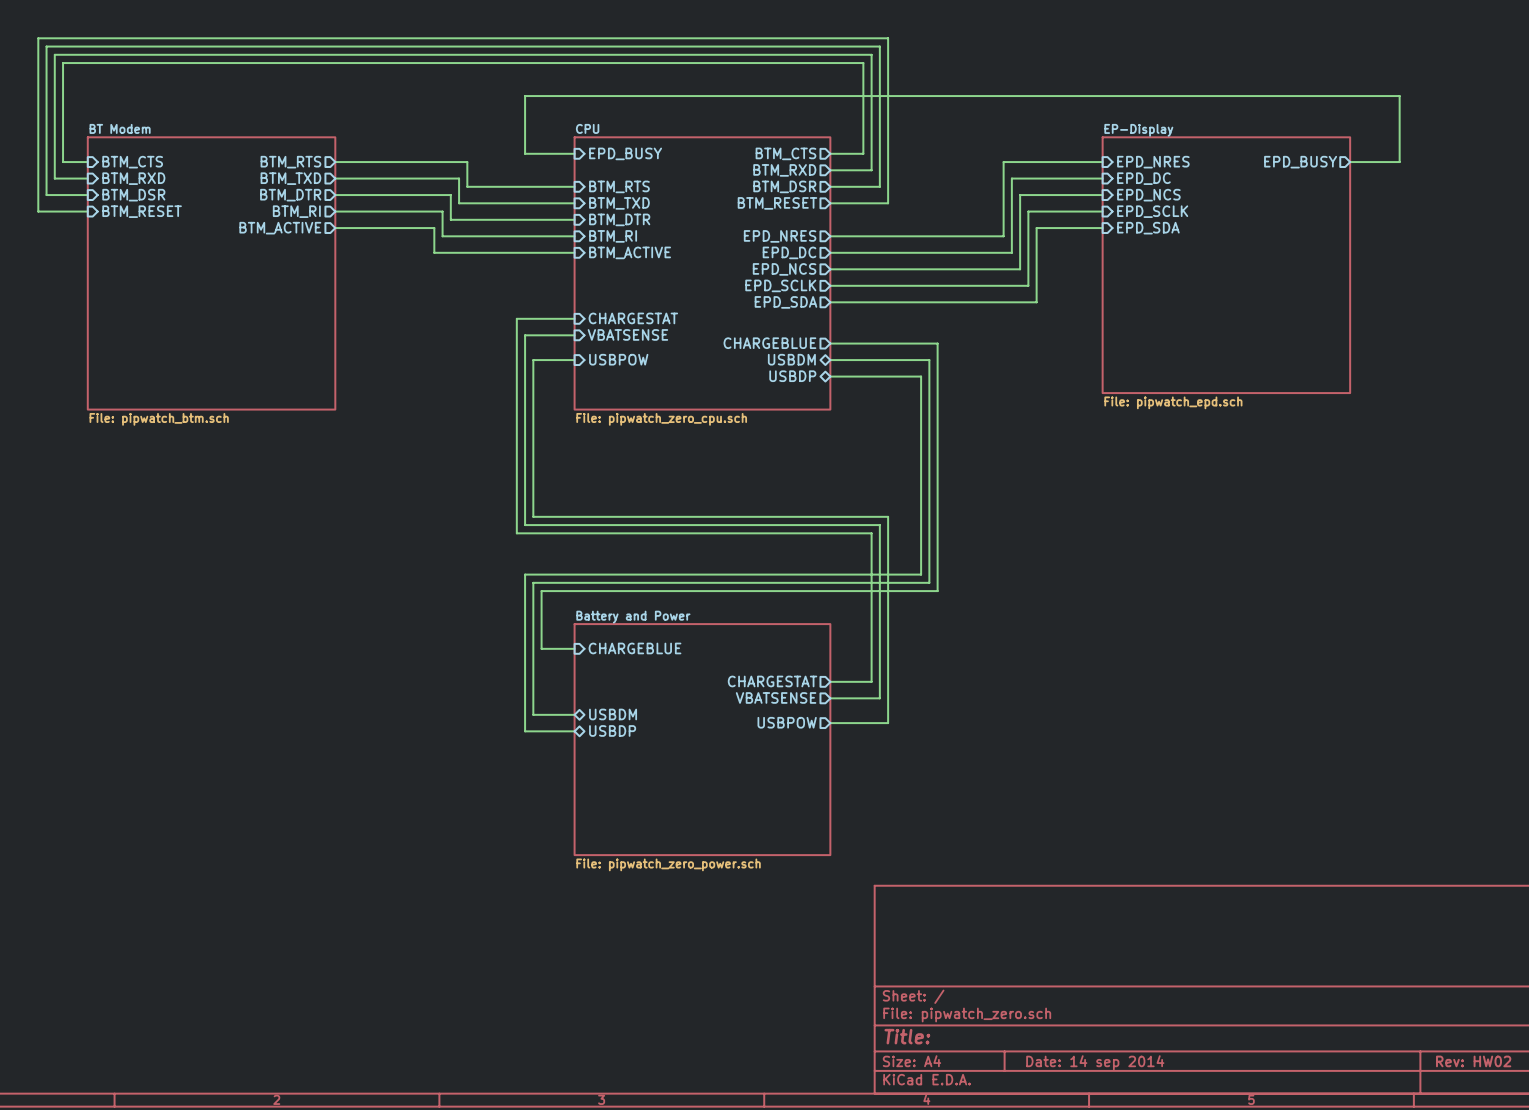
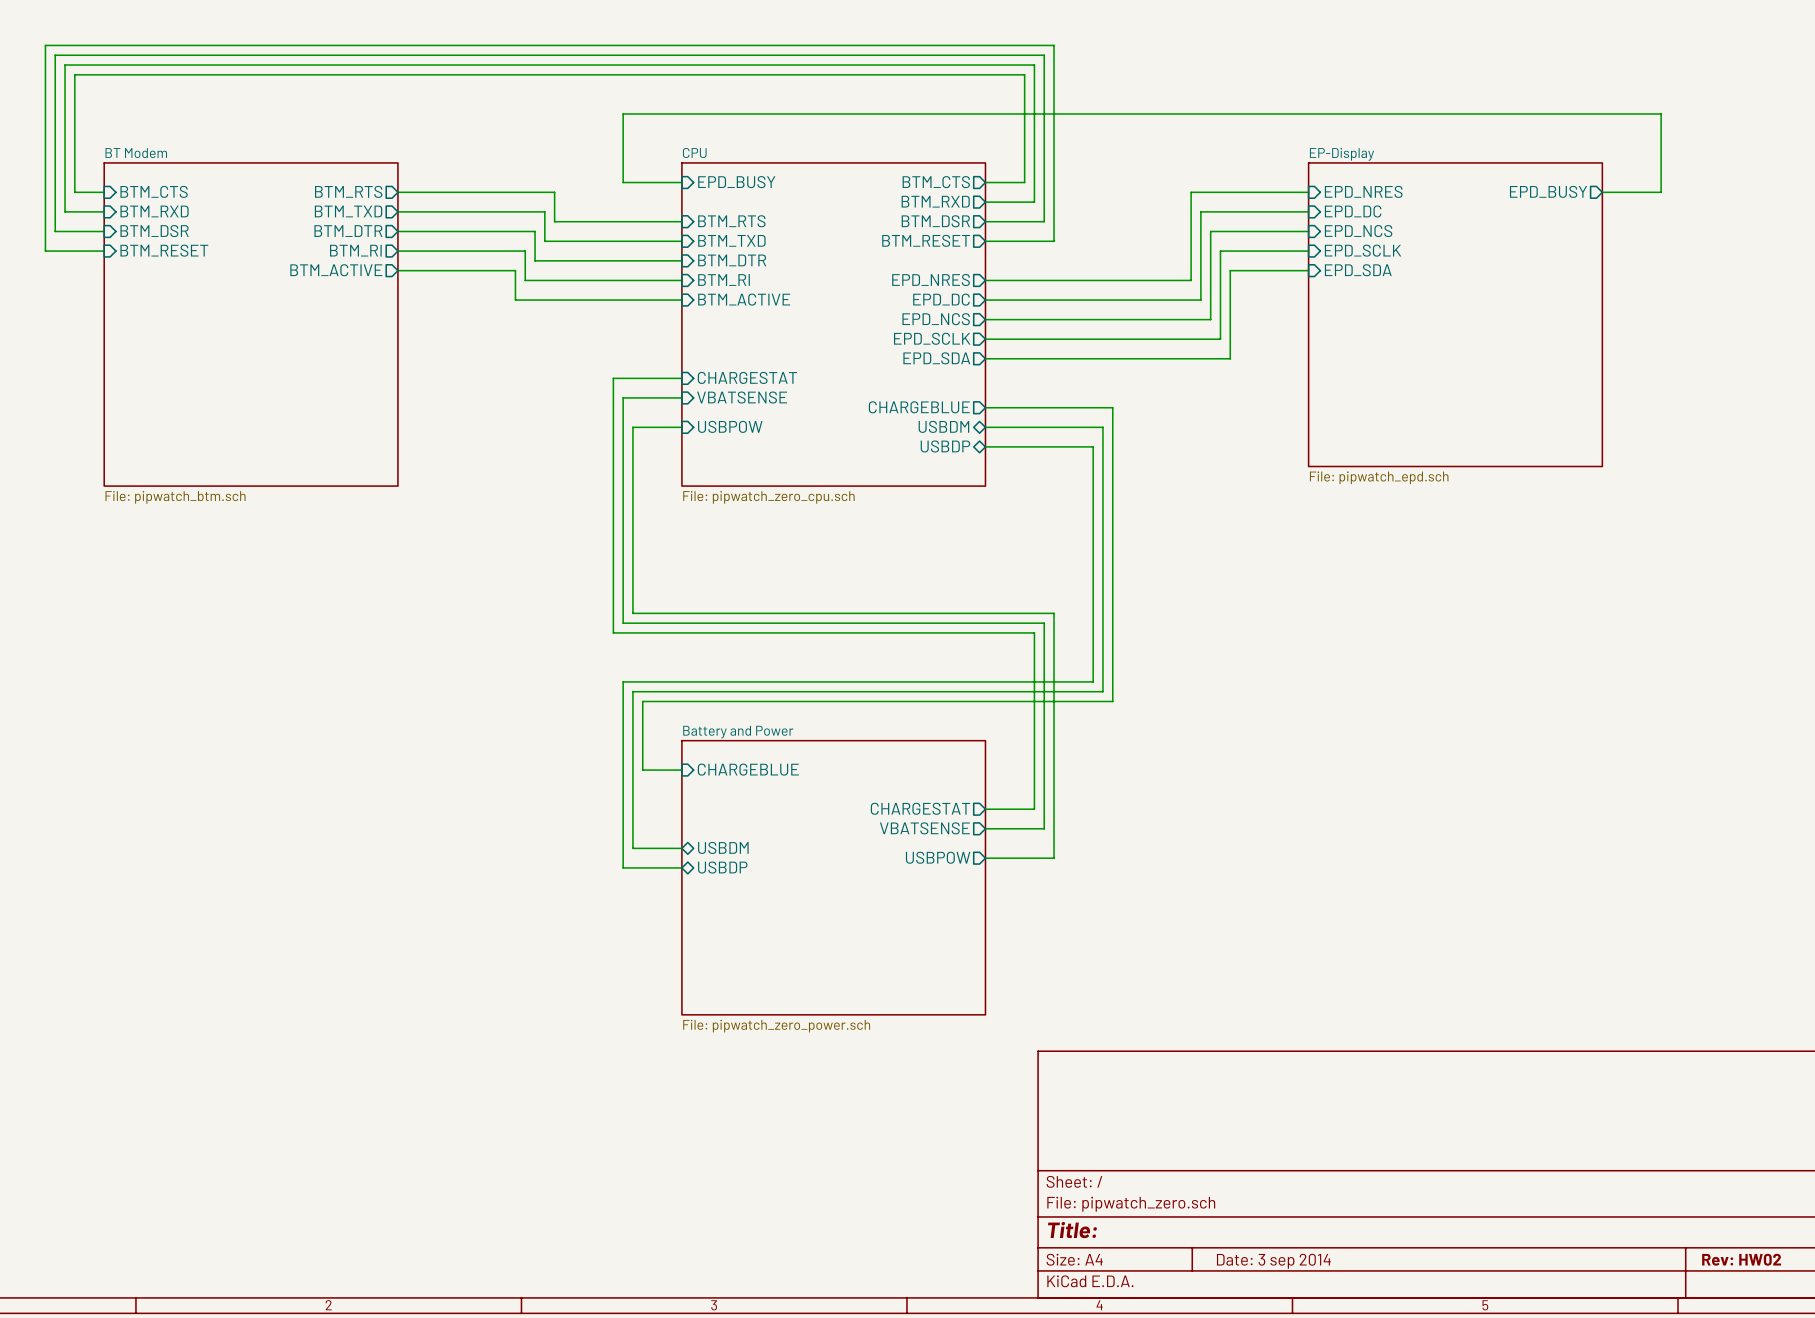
title block: Date: 14 sep 2014 (1095, 1062) -> Date: 3 sep 2014 (1273, 1261)

